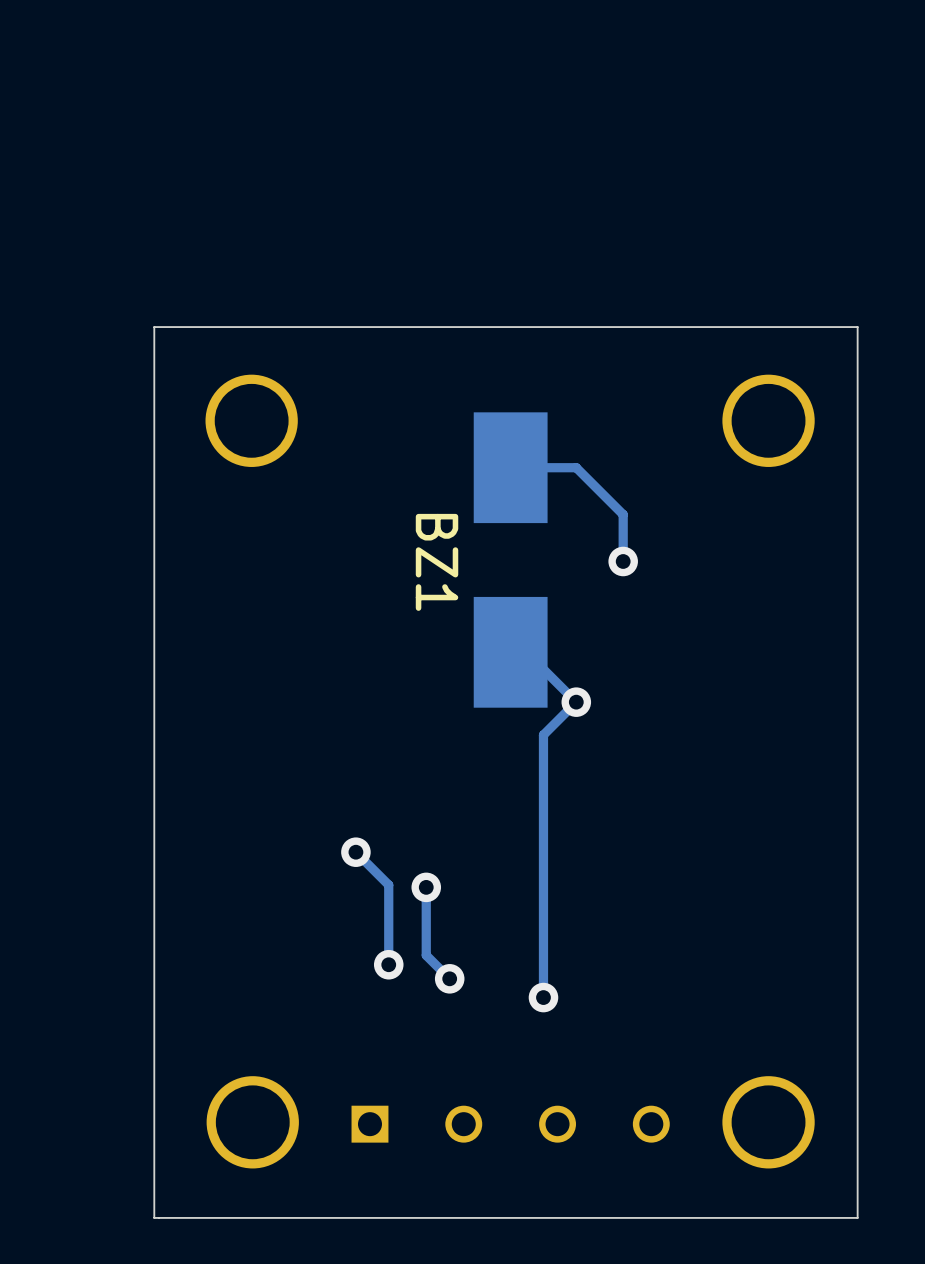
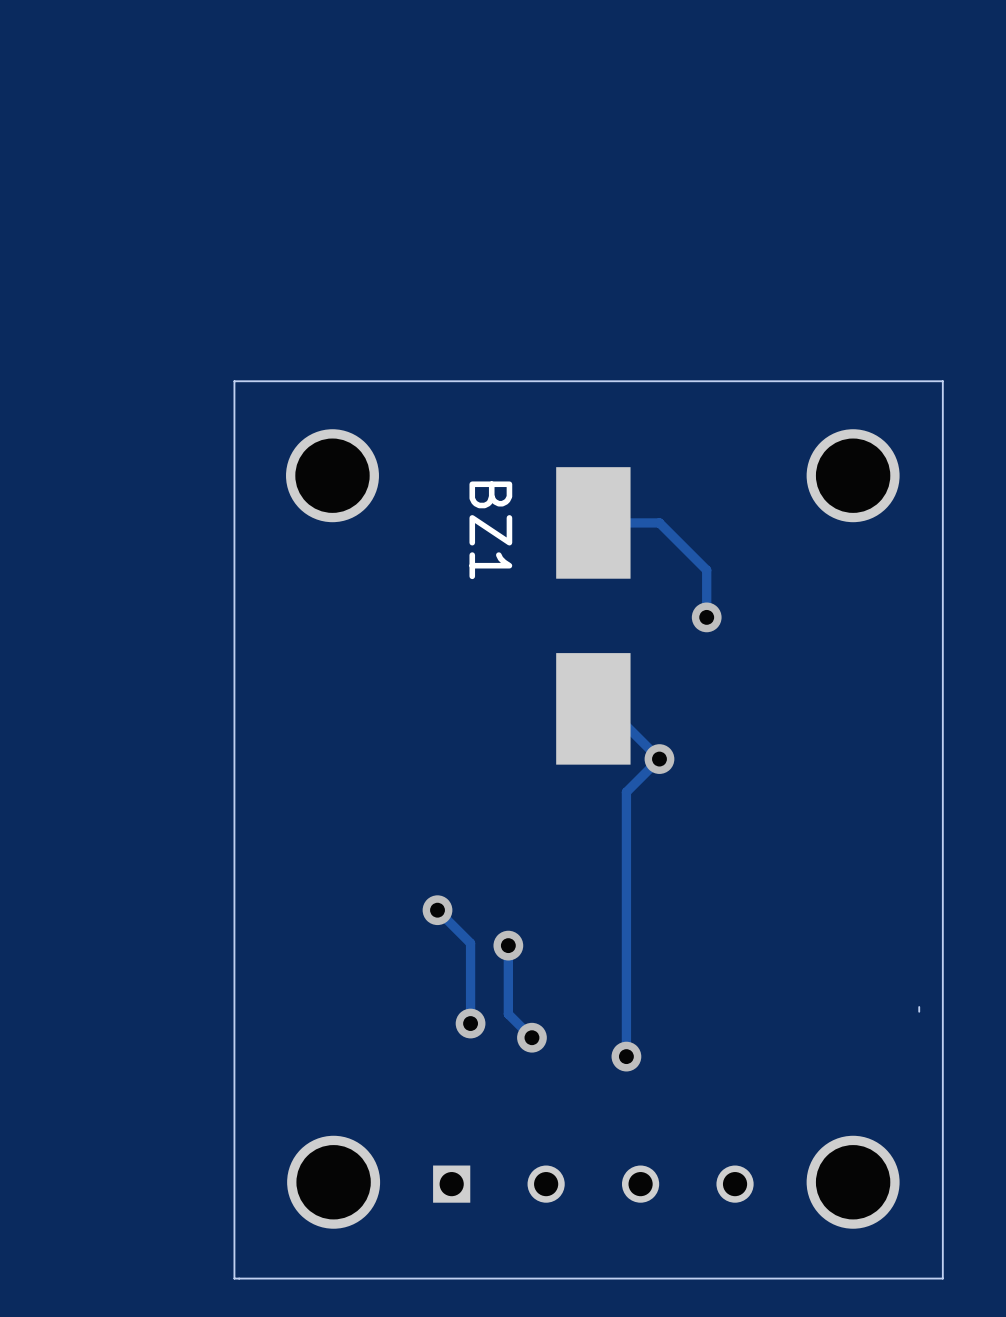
BZ1 name position: BZ1 (437, 562) -> BZ1 (490, 530)
board edge: none -> (919, 1007) (919, 1011)

